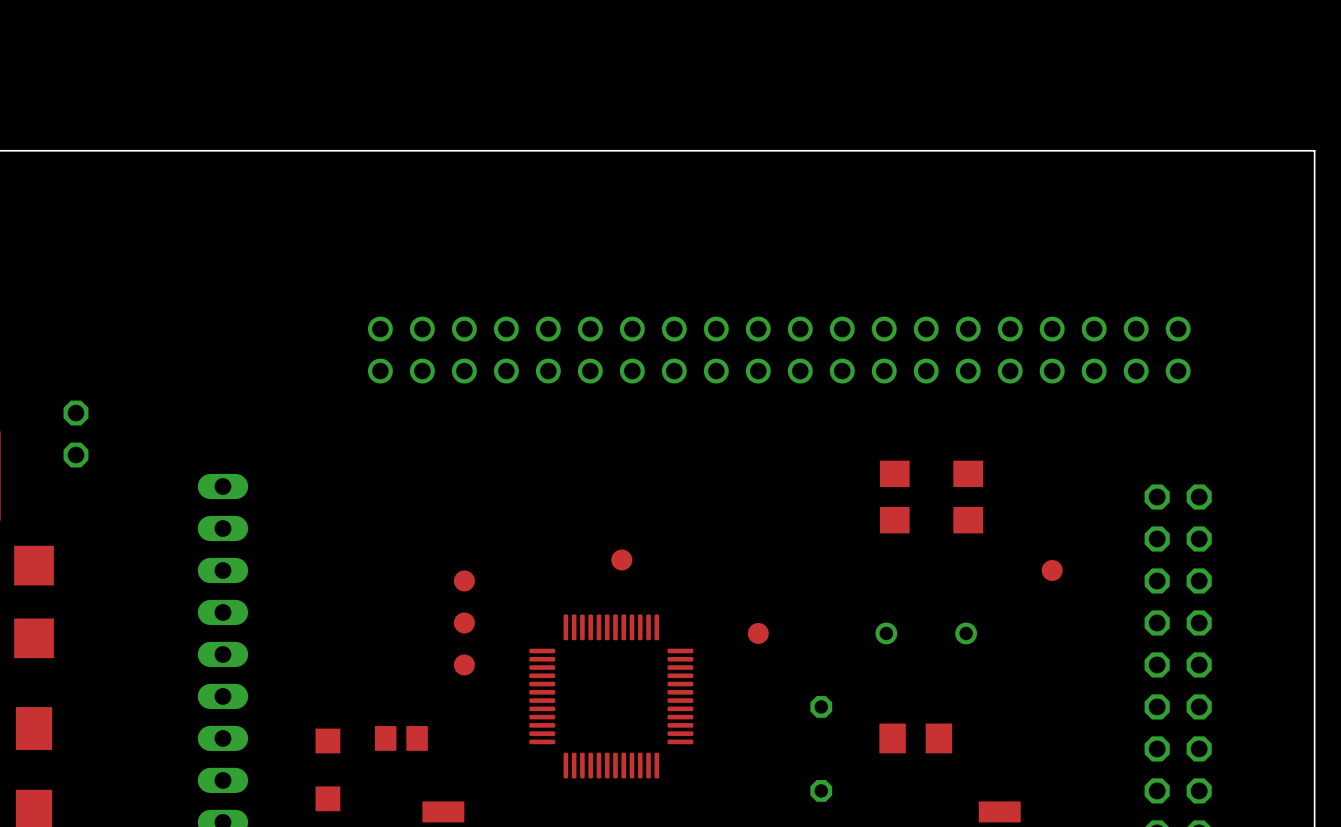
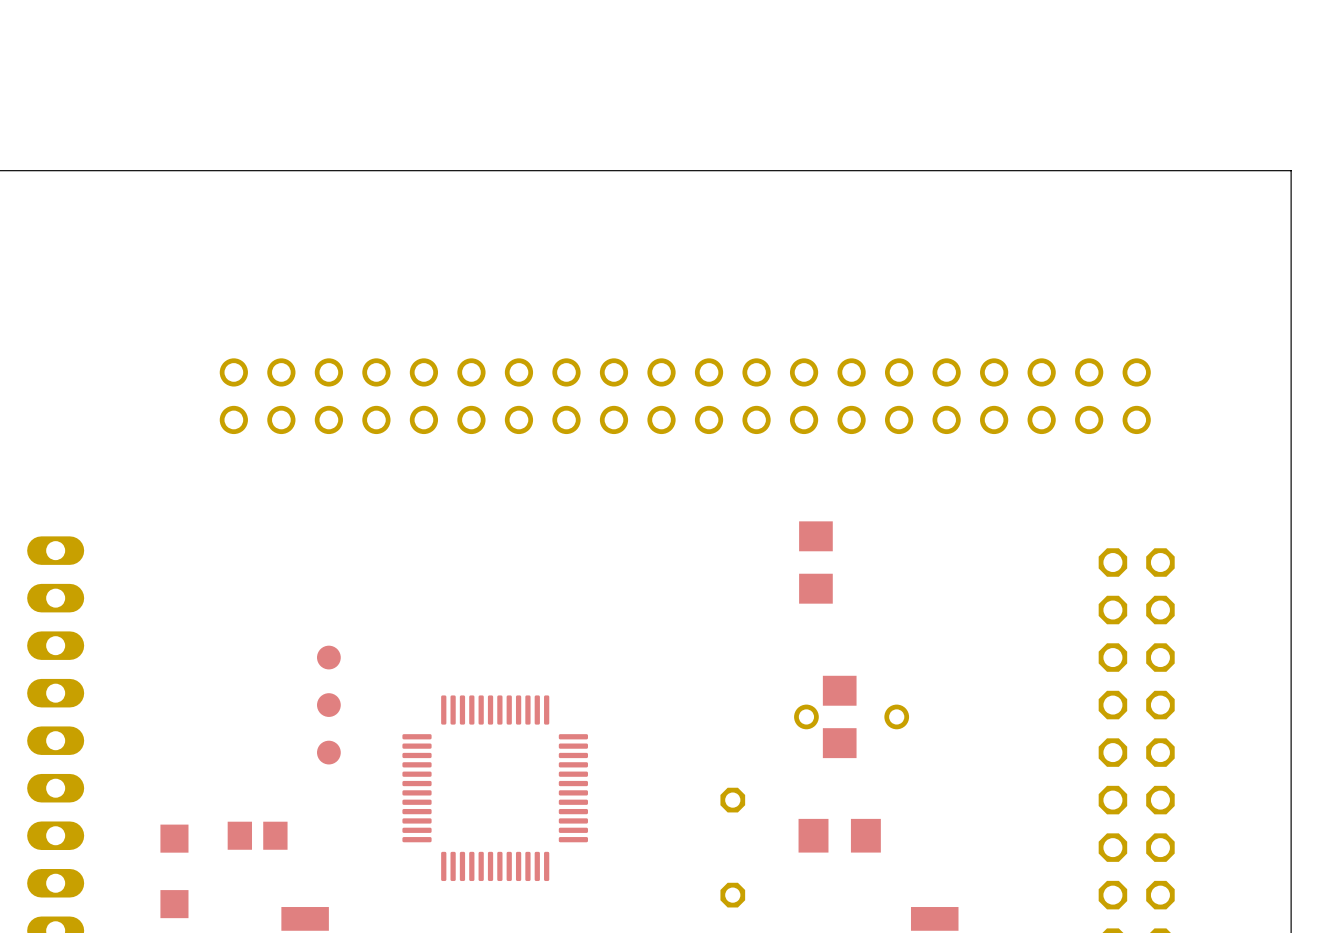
part position: (968, 497) -> (839, 716)
part: (621, 559) -> none
part: (1052, 570) -> none
part: (758, 633) -> none

